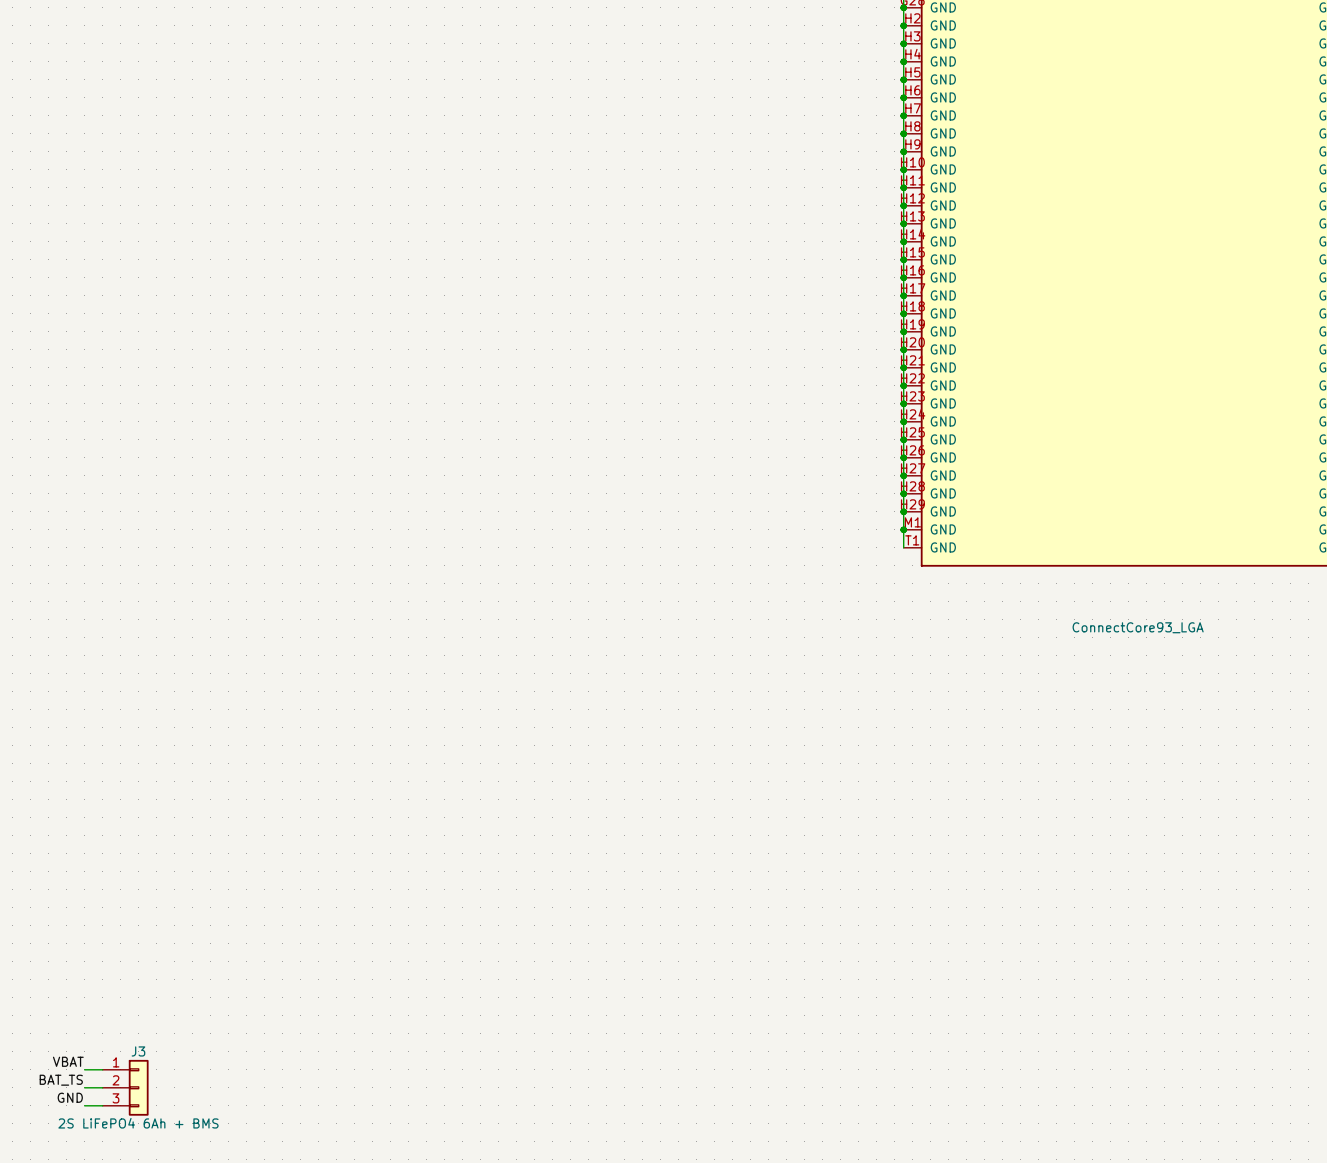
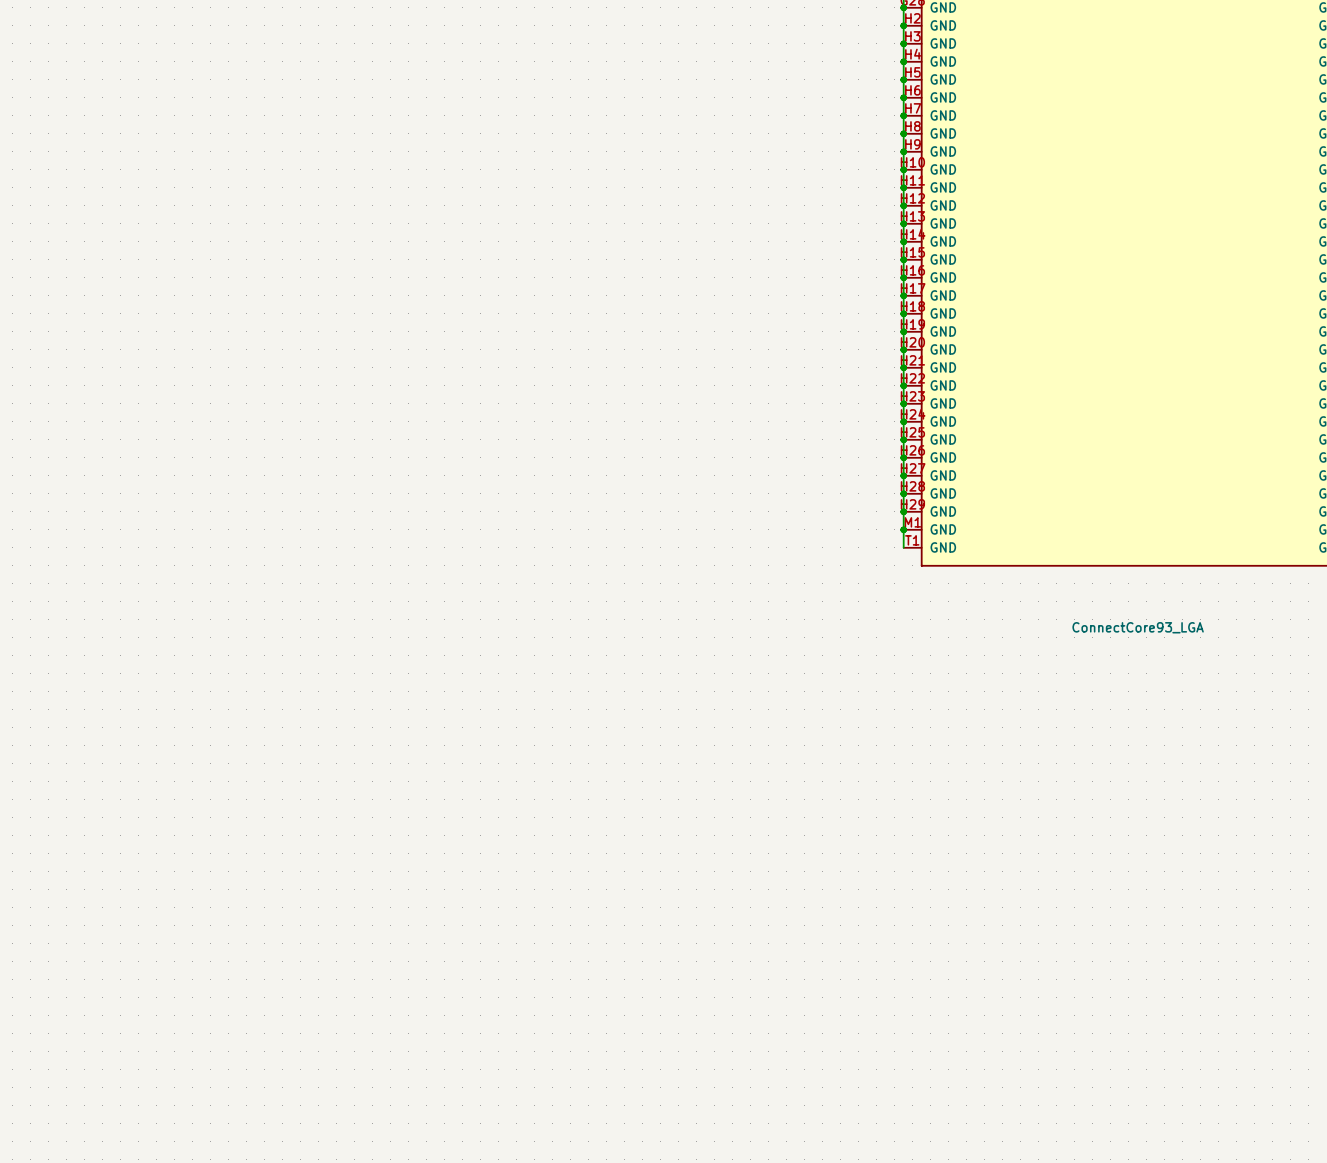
label: VBAT (68, 1061) -> none
wire: (84, 1069) (102, 1069) -> none
label: BAT_TS (61, 1080) -> none
wire: (84, 1087) (102, 1087) -> none
J3: 2S LiFePO4 6Ah + BMS (125, 1087) -> none
label: GND (70, 1097) -> none
wire: (84, 1105) (102, 1105) -> none

